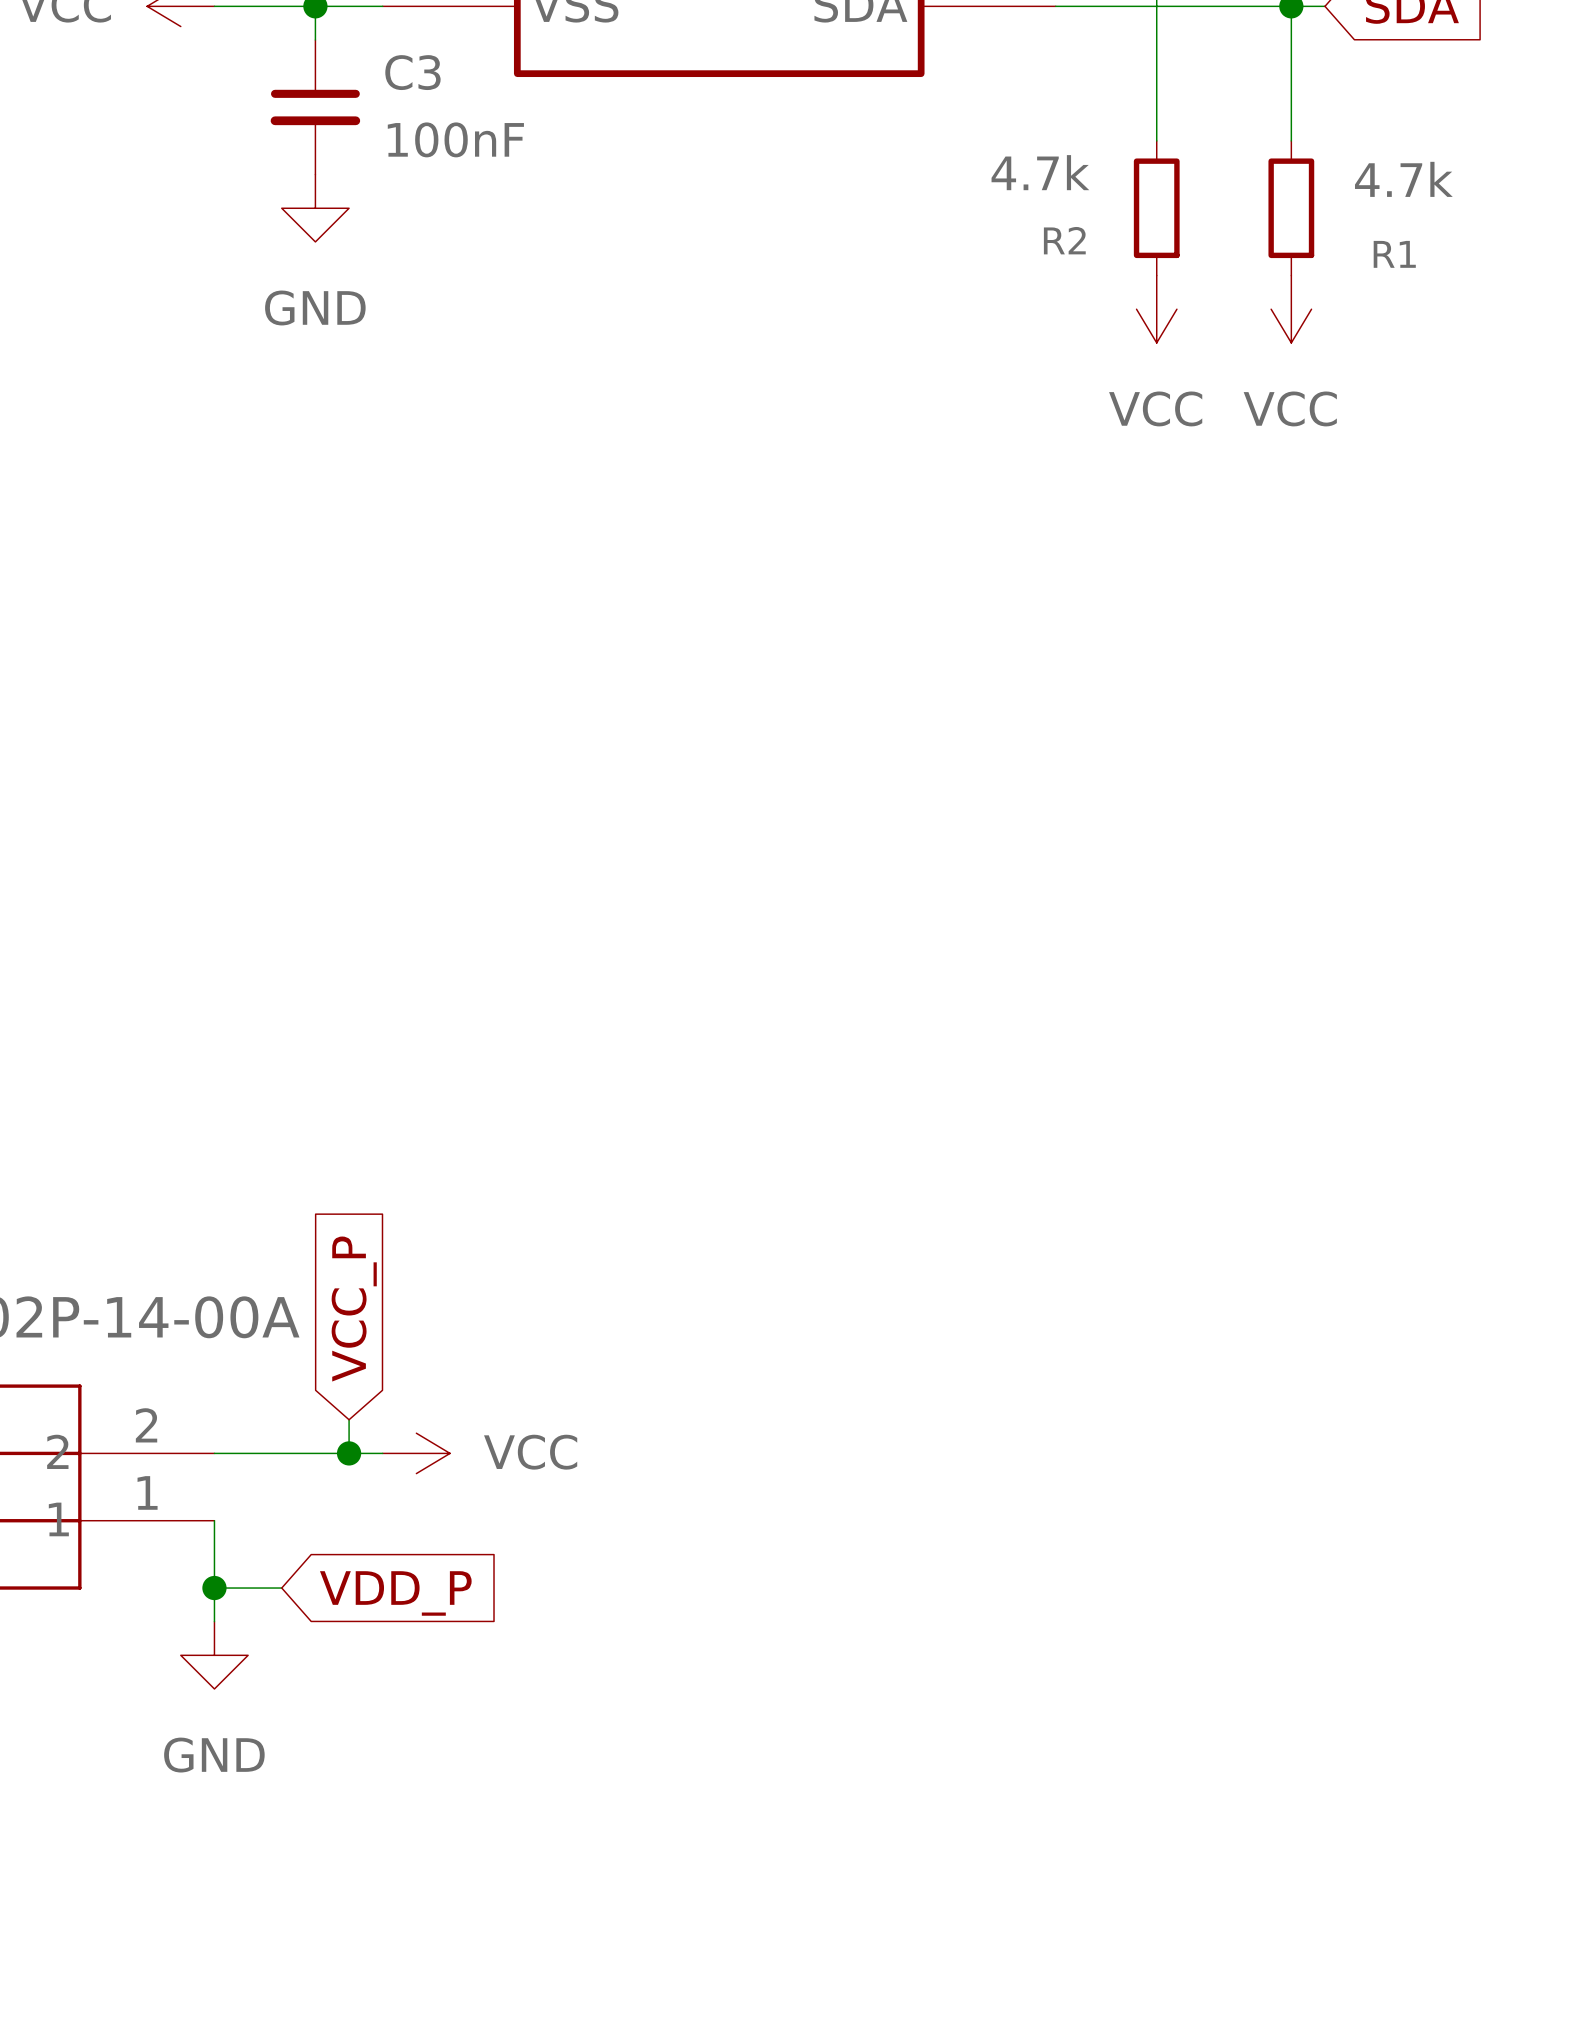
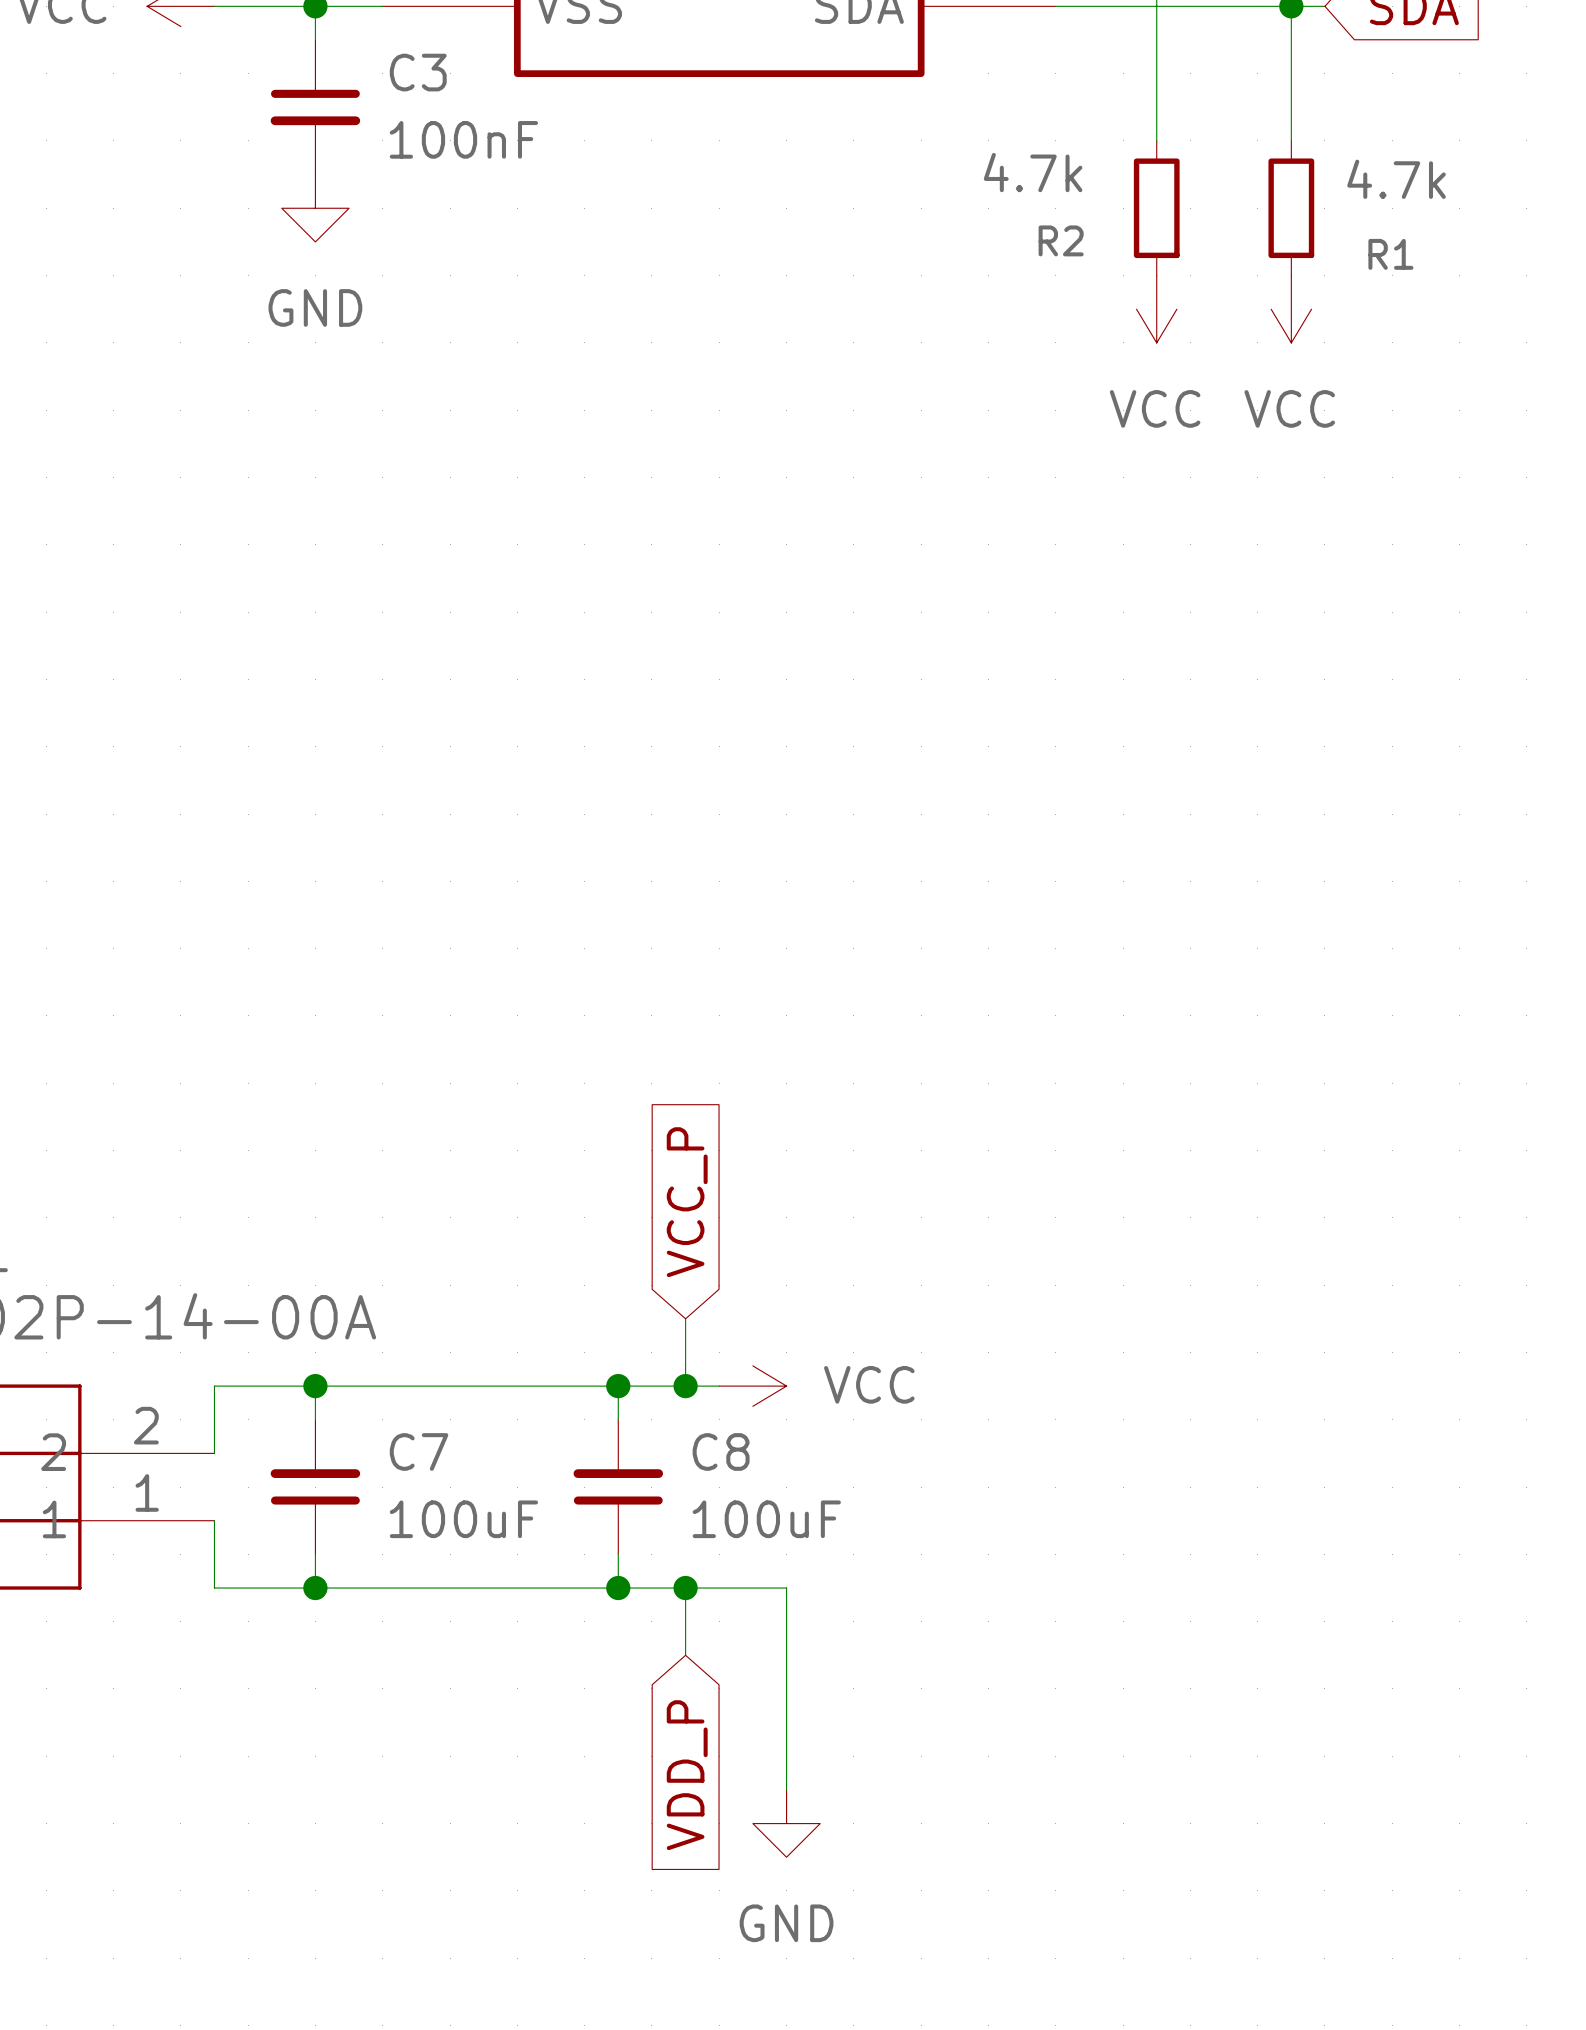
global label position: VCC_P (354, 1309) -> VCC_P (687, 1202)
wire: none -> (685, 1318) (685, 1386)
junction: none -> (315, 1386)
wire: none -> (618, 1386) (618, 1419)
junction: none -> (618, 1386)
junction: none -> (685, 1386)
wire: (349, 1419) (349, 1453) -> (315, 1386) (315, 1419)
wire: (214, 1453) (382, 1453) -> (214, 1453) (214, 1386) (719, 1386)
junction: (349, 1453) -> none
power symbol position: VCC (416, 1453) -> VCC (752, 1386)
C7: none -> 100uF (315, 1487)
C8: none -> 100uF (618, 1487)
wire: none -> (618, 1554) (618, 1588)
wire: (214, 1588) (214, 1621) -> (315, 1554) (315, 1588)
junction: (214, 1588) -> none
wire: none -> (281, 1588) (786, 1588) (786, 1789)
junction: none -> (315, 1588)
junction: none -> (618, 1588)
wire: none -> (685, 1588) (685, 1655)
junction: none -> (685, 1588)
global label rotation: 0° (395, 1593) -> 90° clockwise (687, 1775)
global label position: VDD_P (395, 1593) -> VDD_P (687, 1775)
power symbol position: GND (214, 1655) -> GND (786, 1823)

